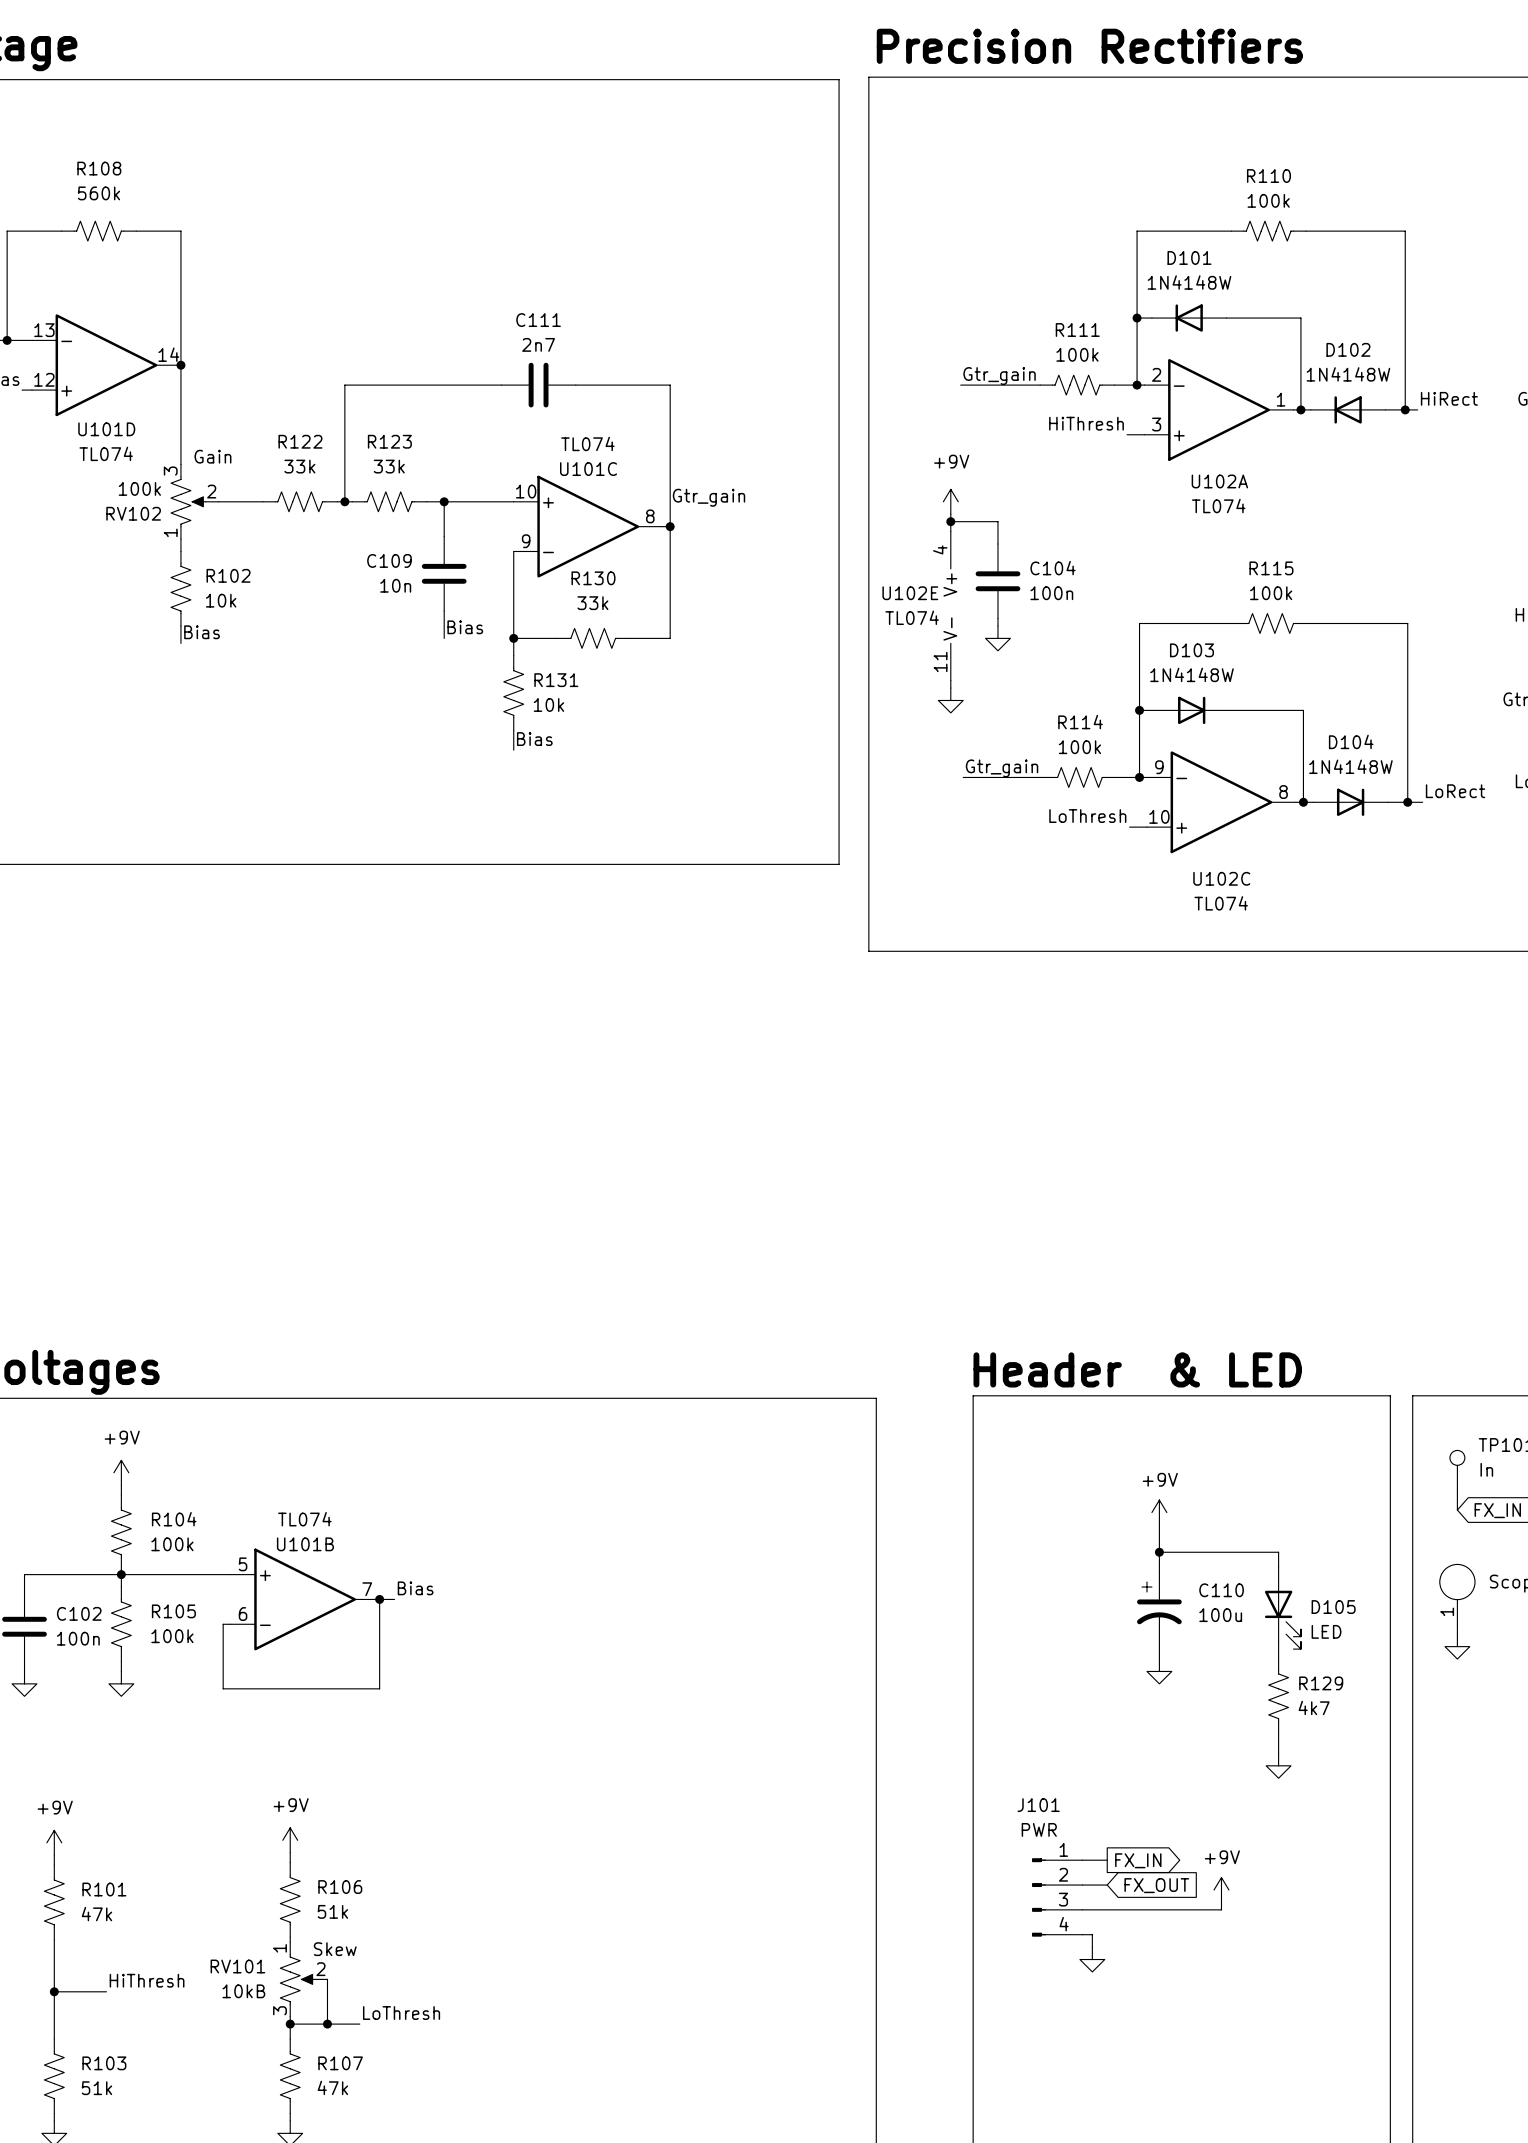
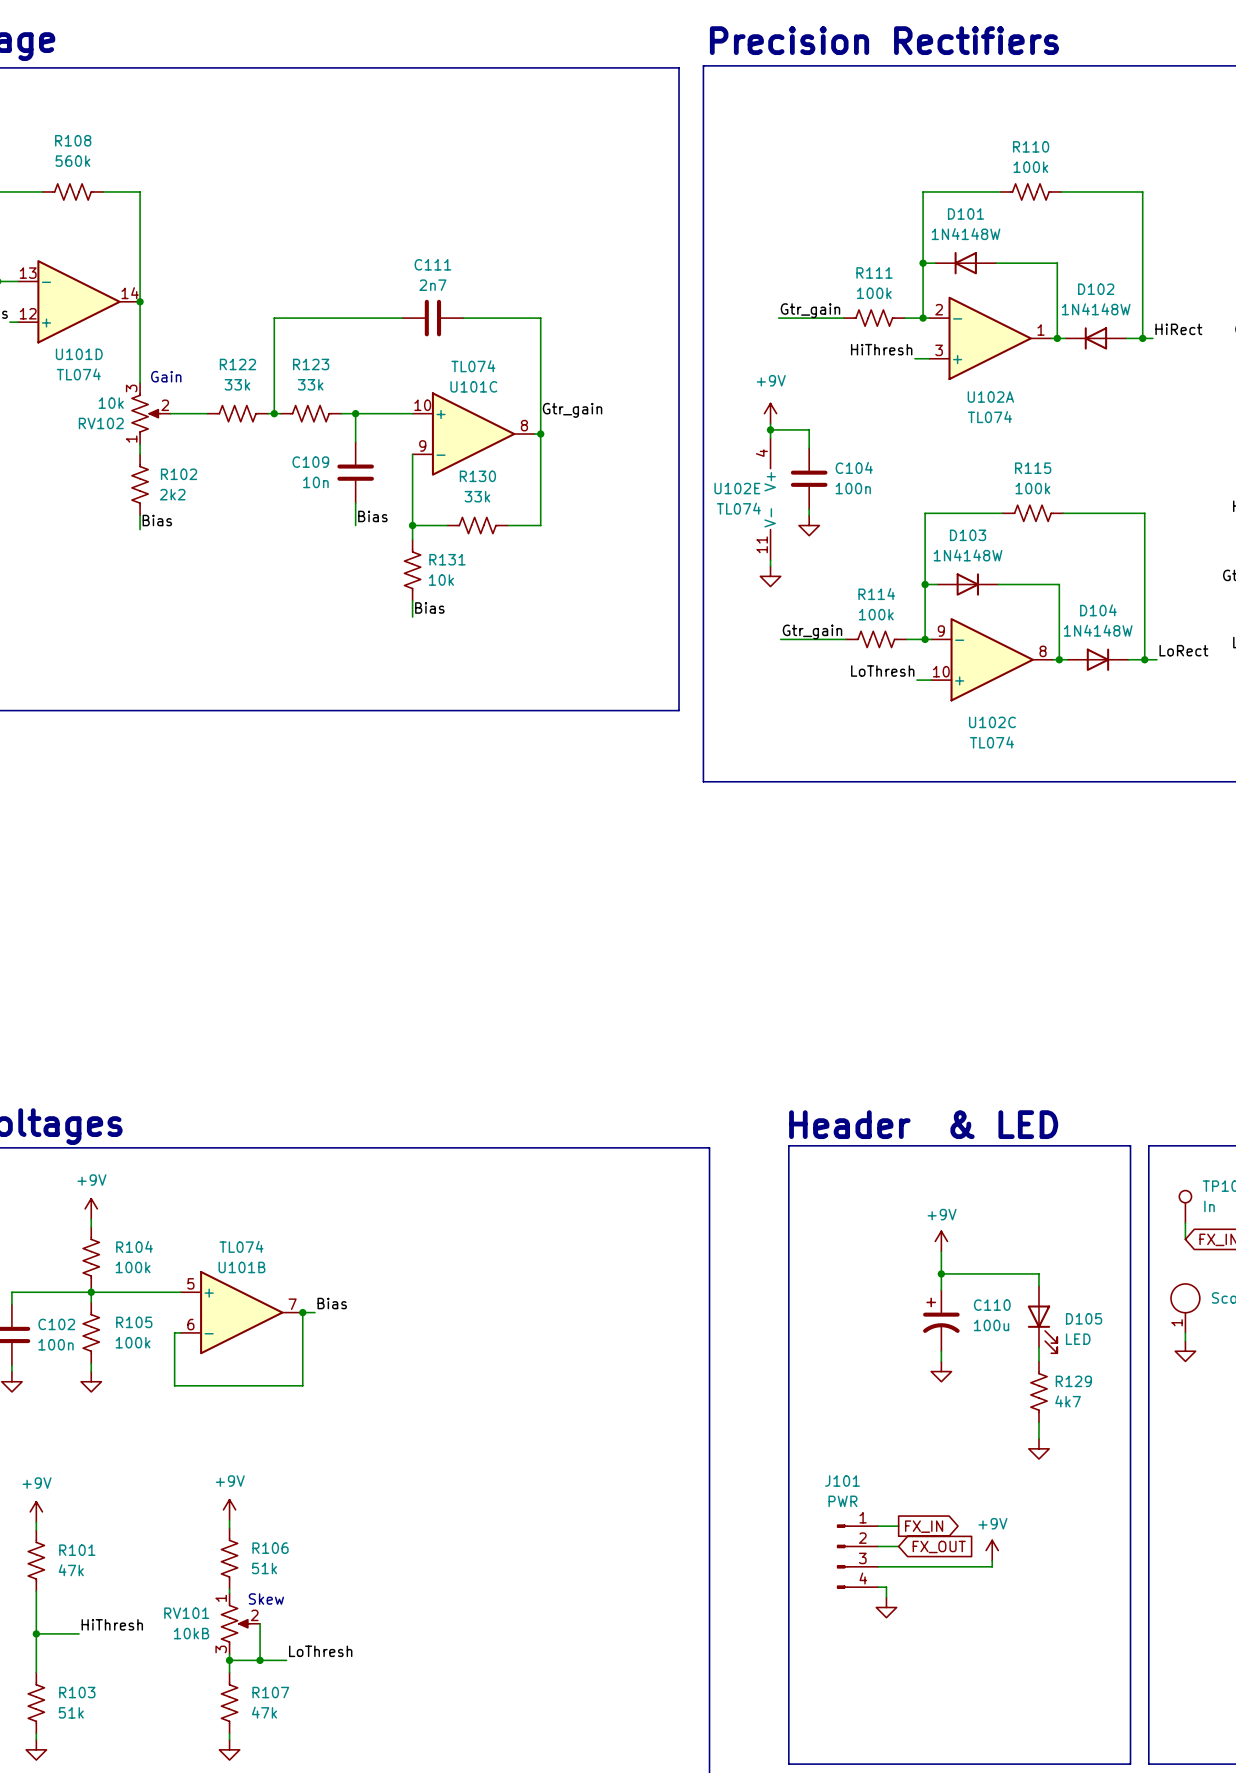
RV102 value: 100k (139, 488) -> 10k (111, 403)
R102 value: 10k (221, 600) -> 2k2 (172, 494)

